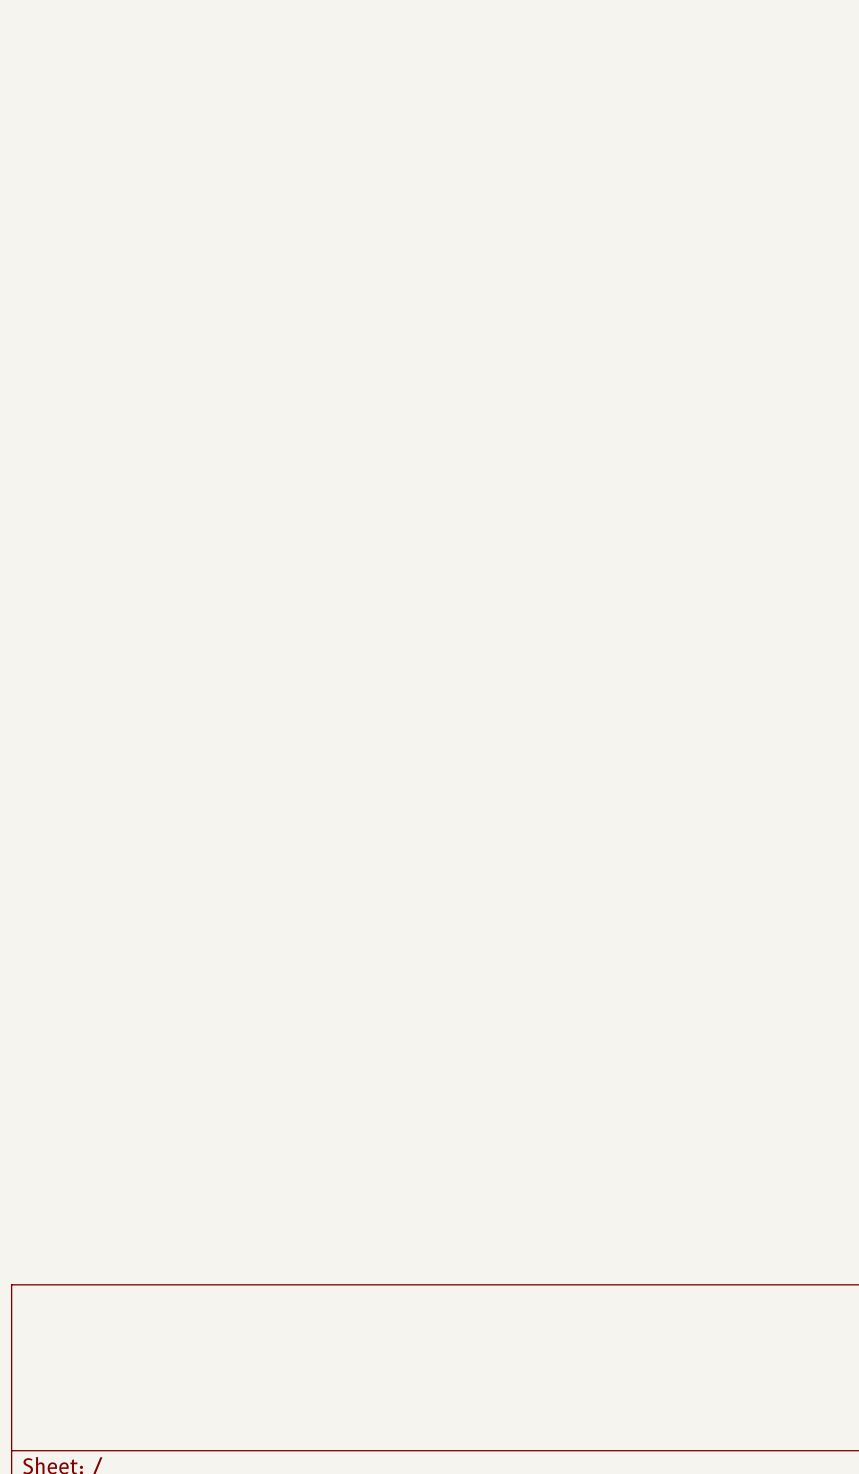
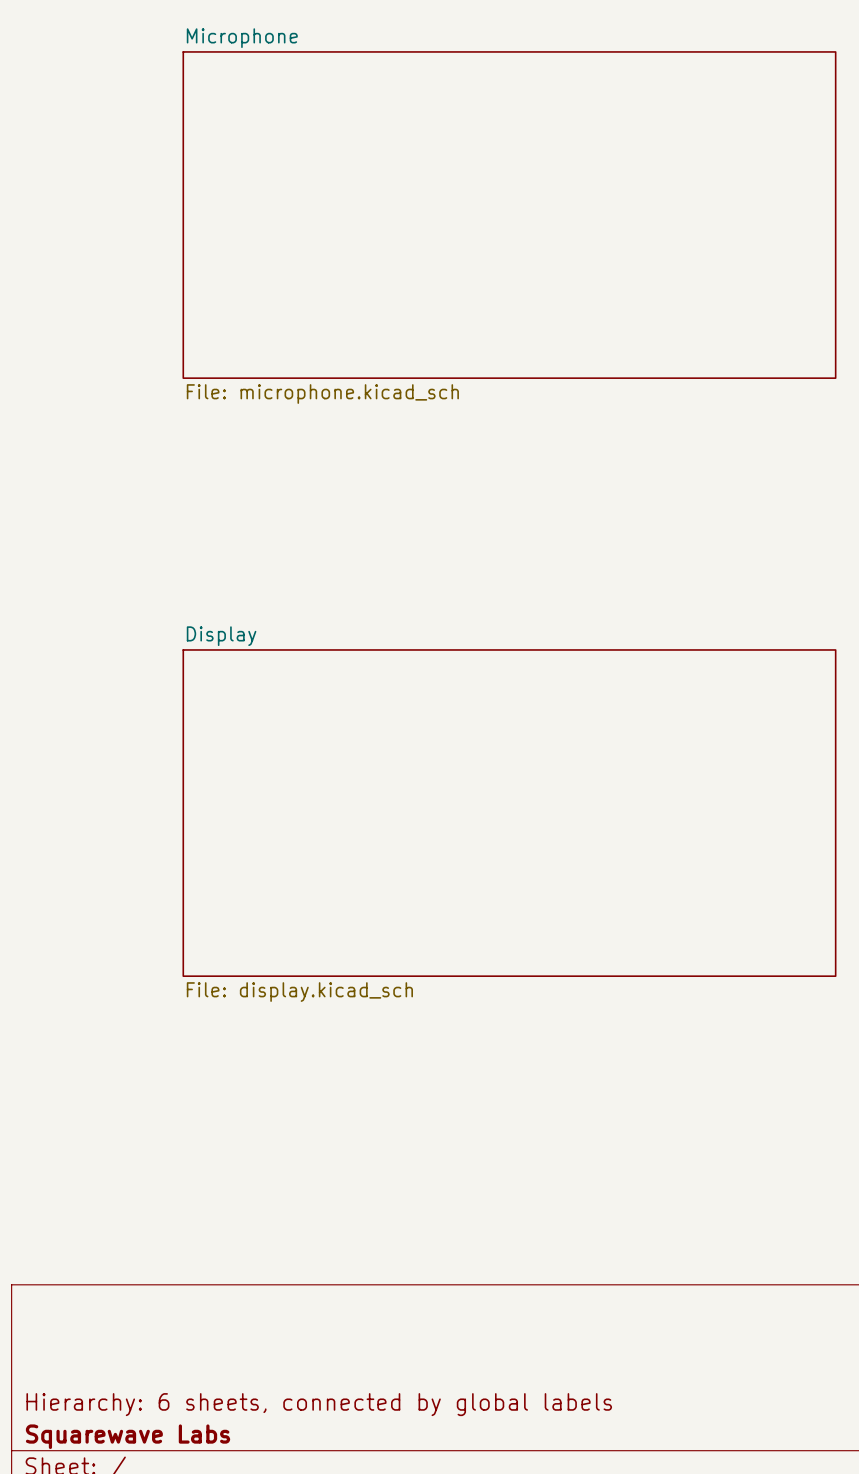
sheet Microphone: none -> File: microphone.kicad_sch (509, 215)
sheet Display: none -> File: display.kicad_sch (509, 813)
title block: none -> Hierarchy: 6 sheets, connected by global labels (319, 1404)
title block: none -> Squarewave Labs (128, 1436)

